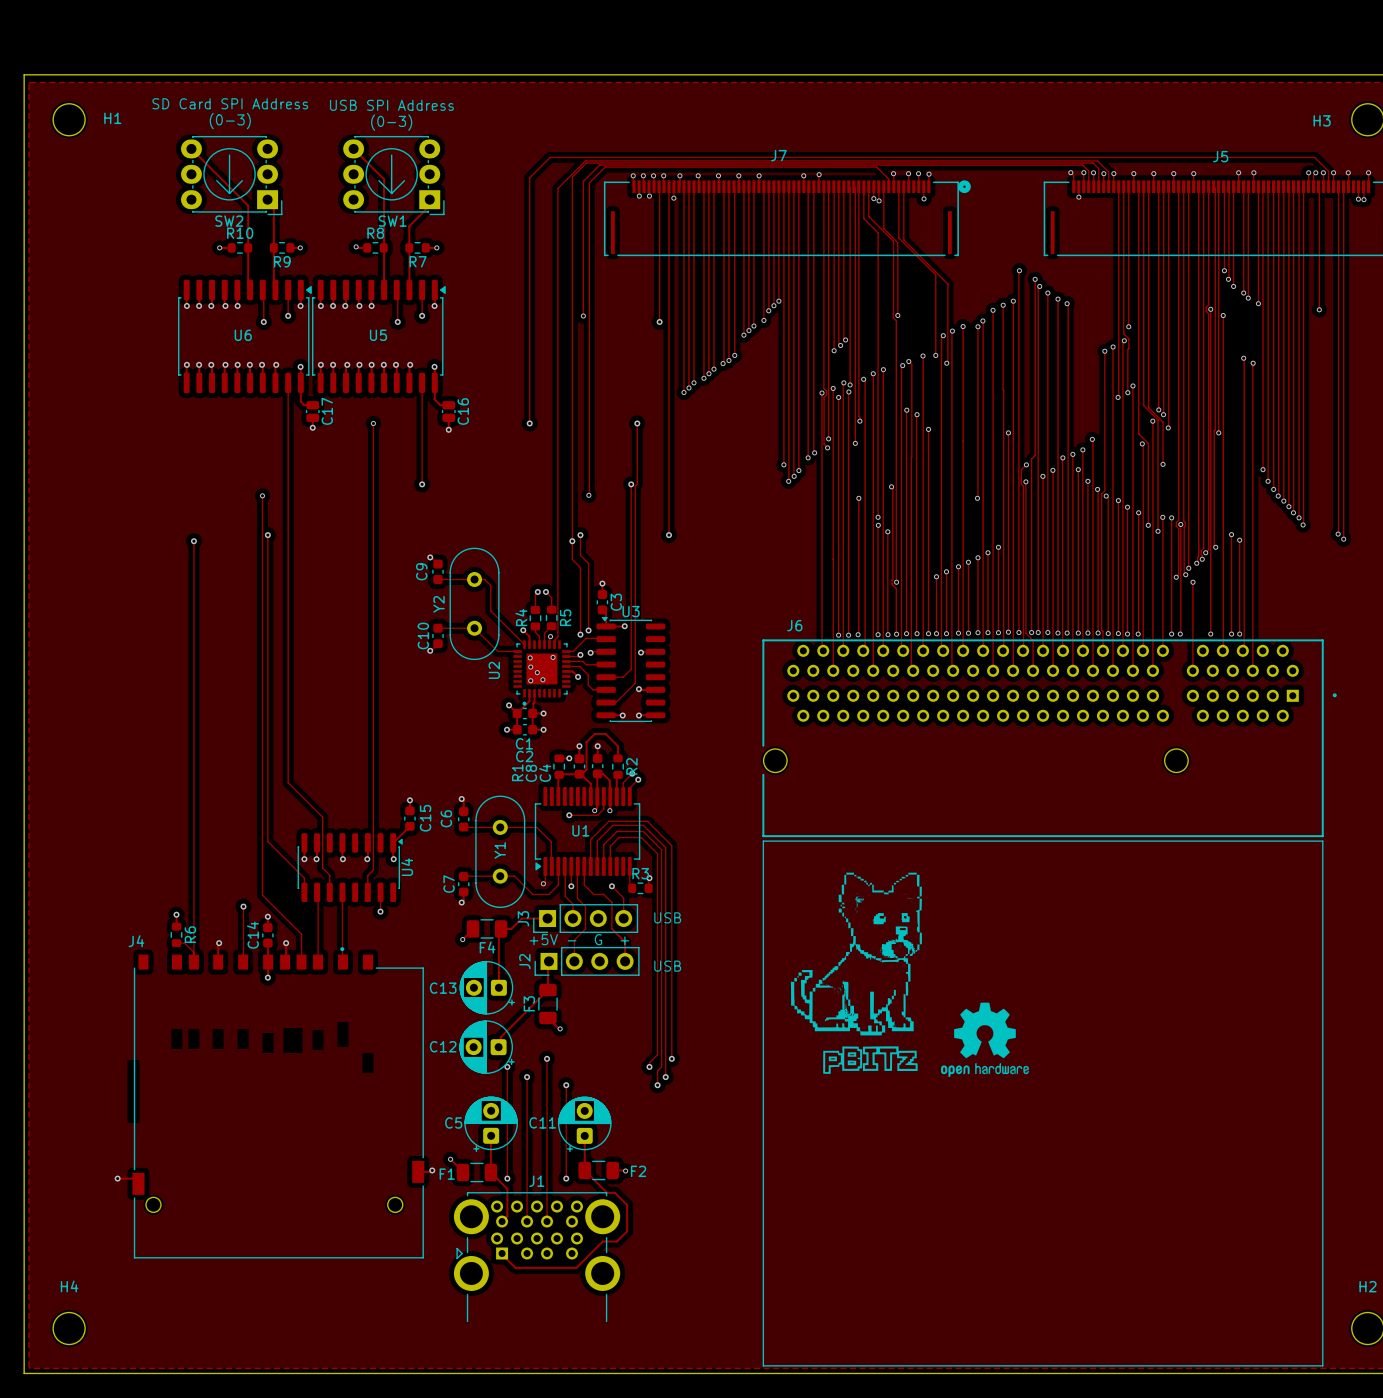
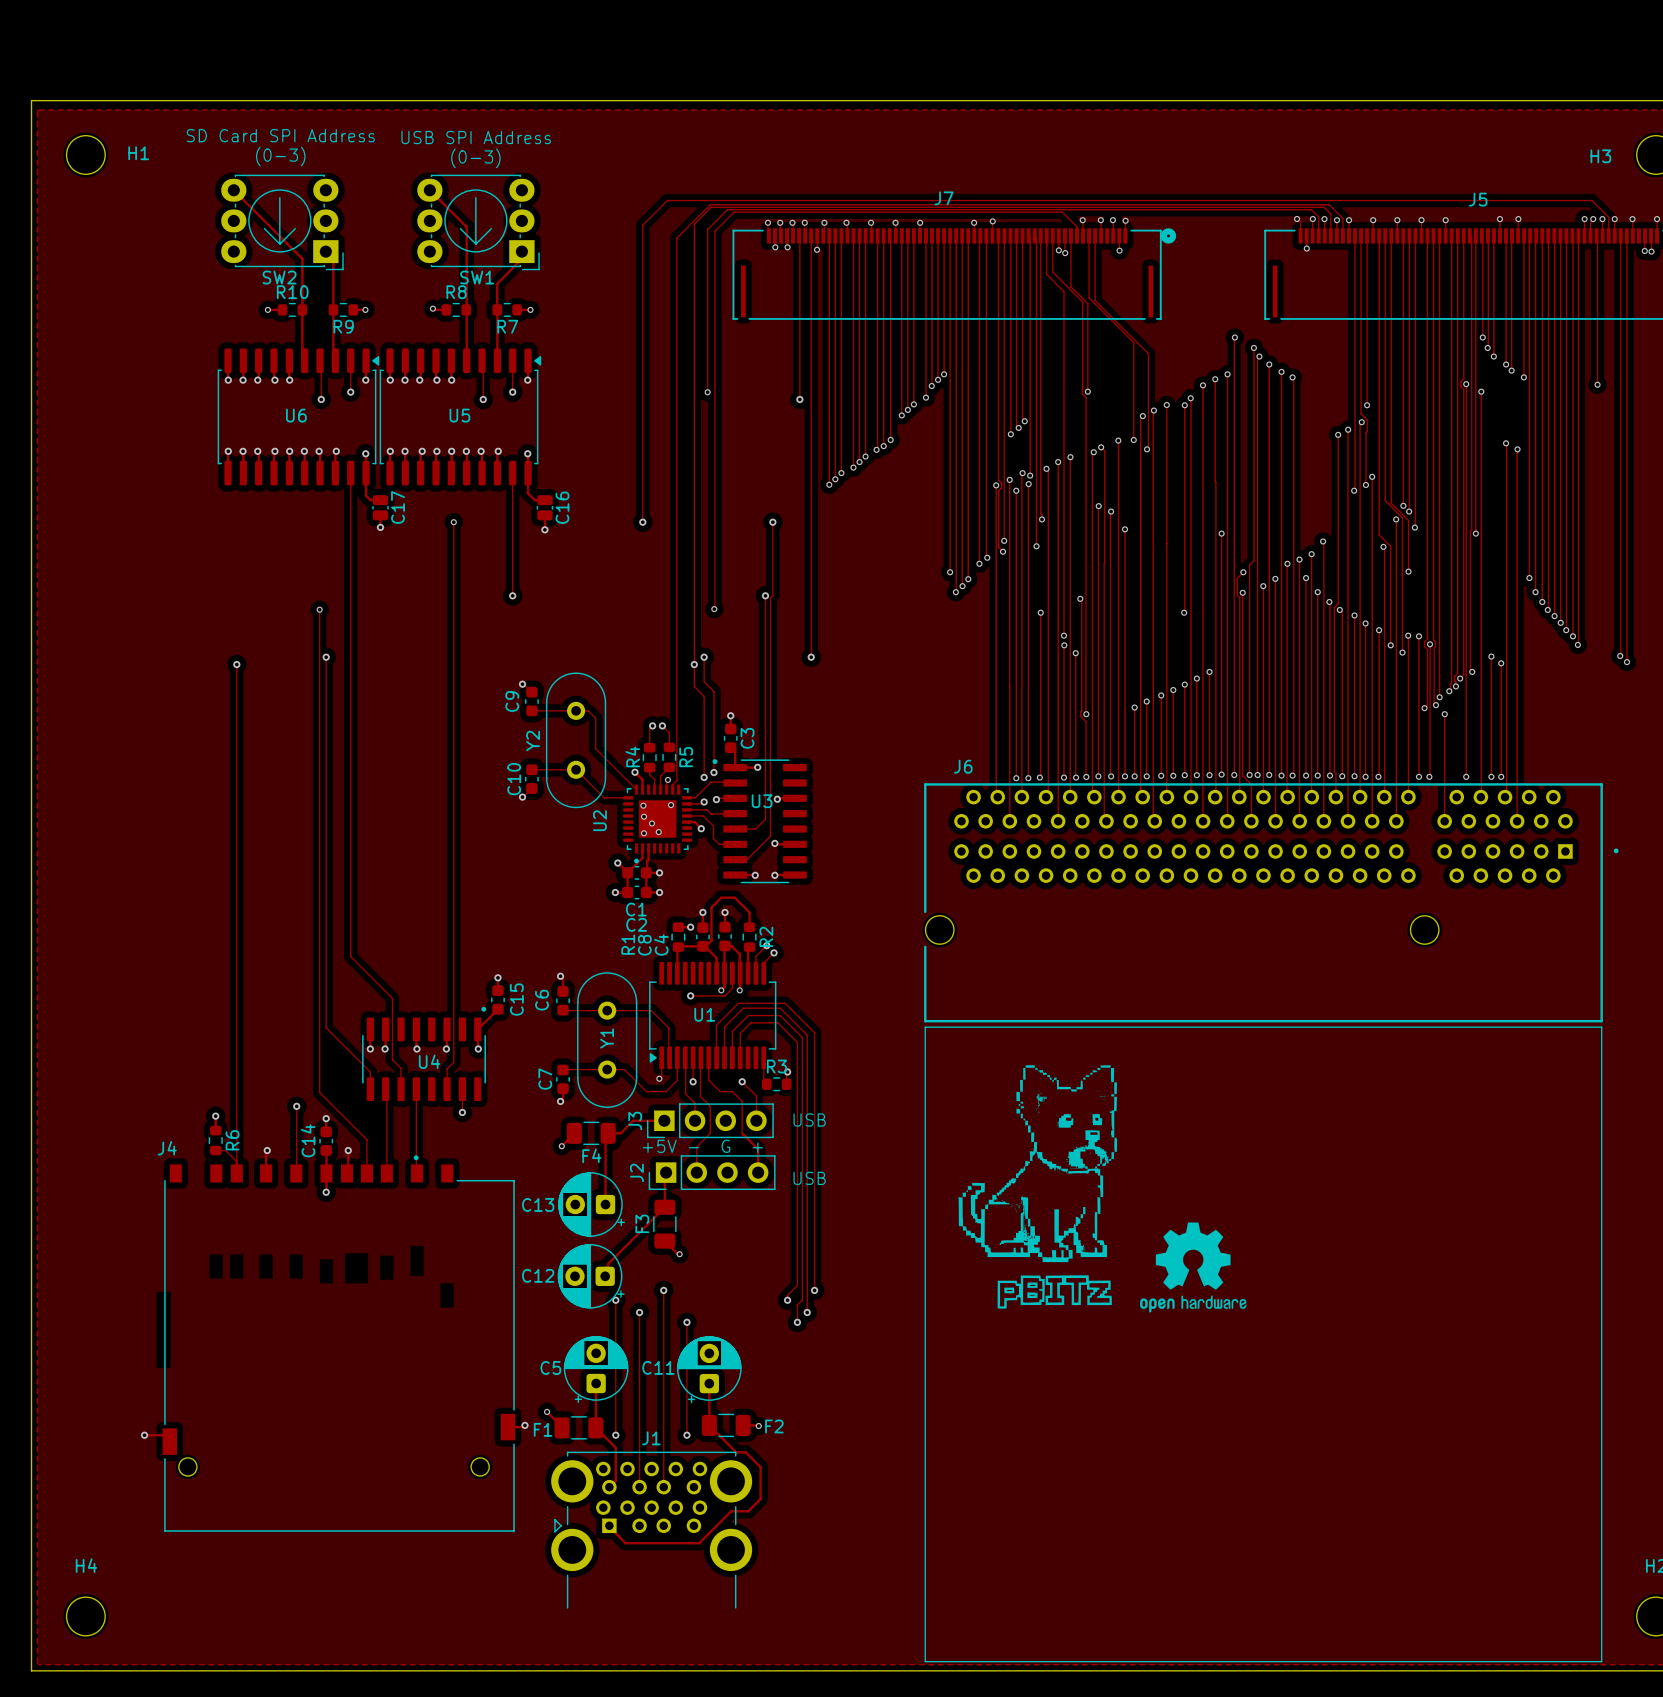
U3 name position: U3 (631, 611) -> U3 (762, 801)
U3 footprint: [596, 616, 666, 723] -> [712, 759, 807, 884]
U4 footprint: [297, 833, 403, 903] -> [362, 1006, 487, 1102]
U4 name position: U4 (407, 867) -> U4 (429, 1061)

